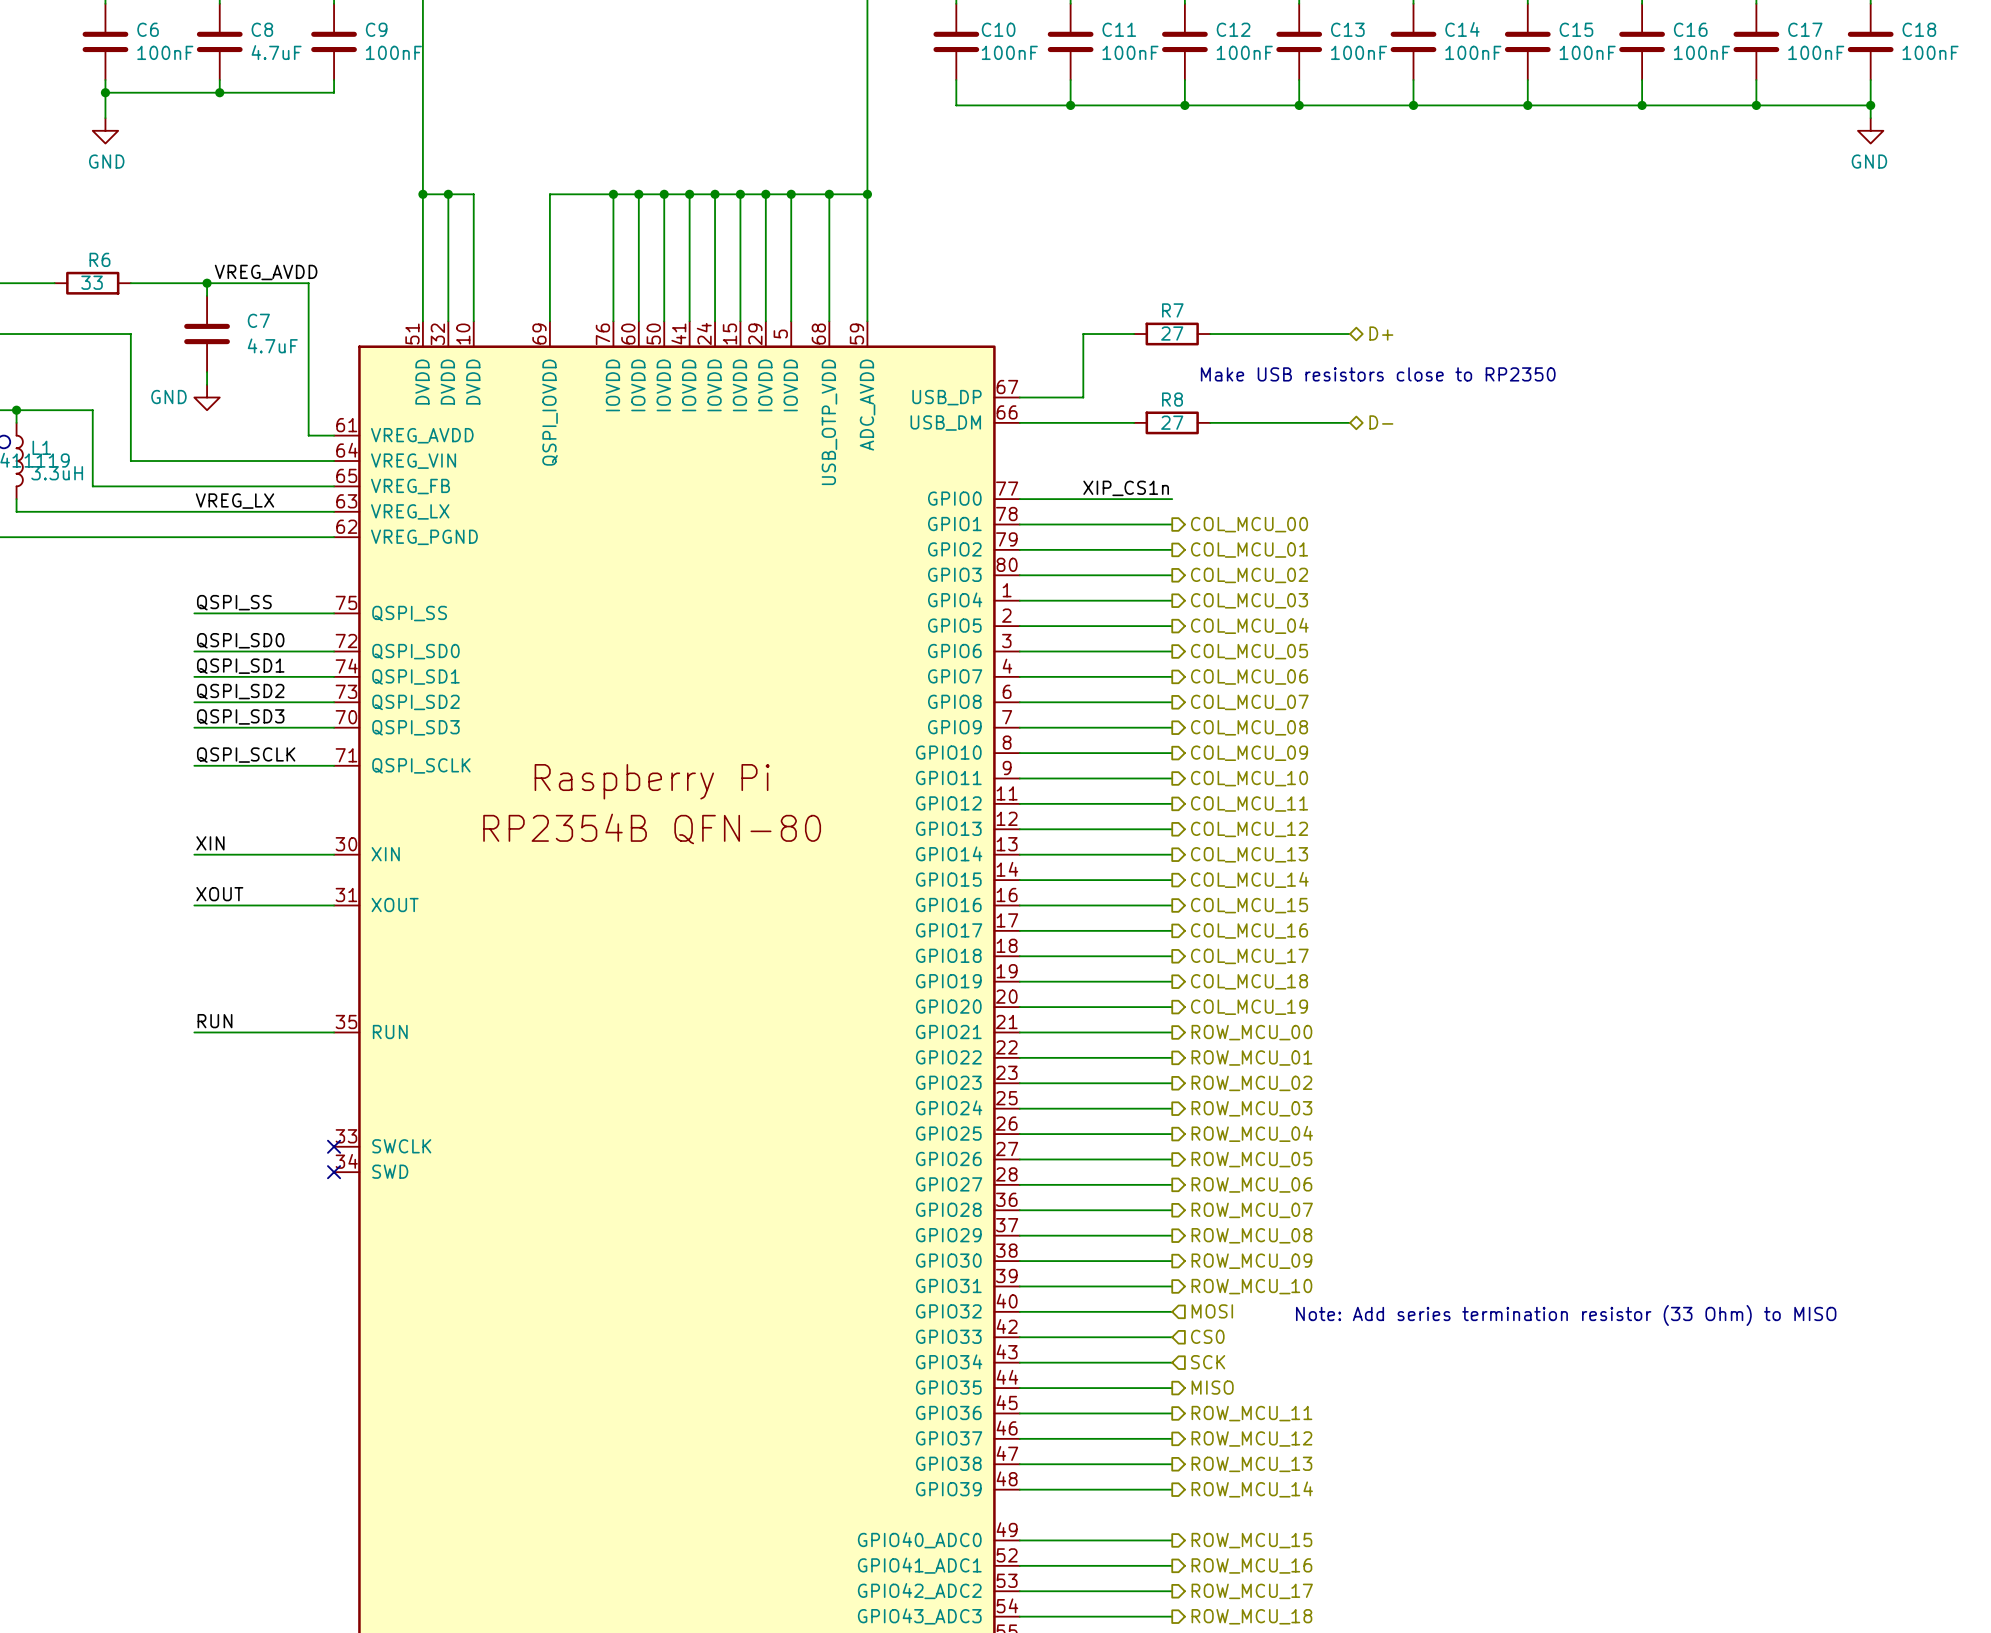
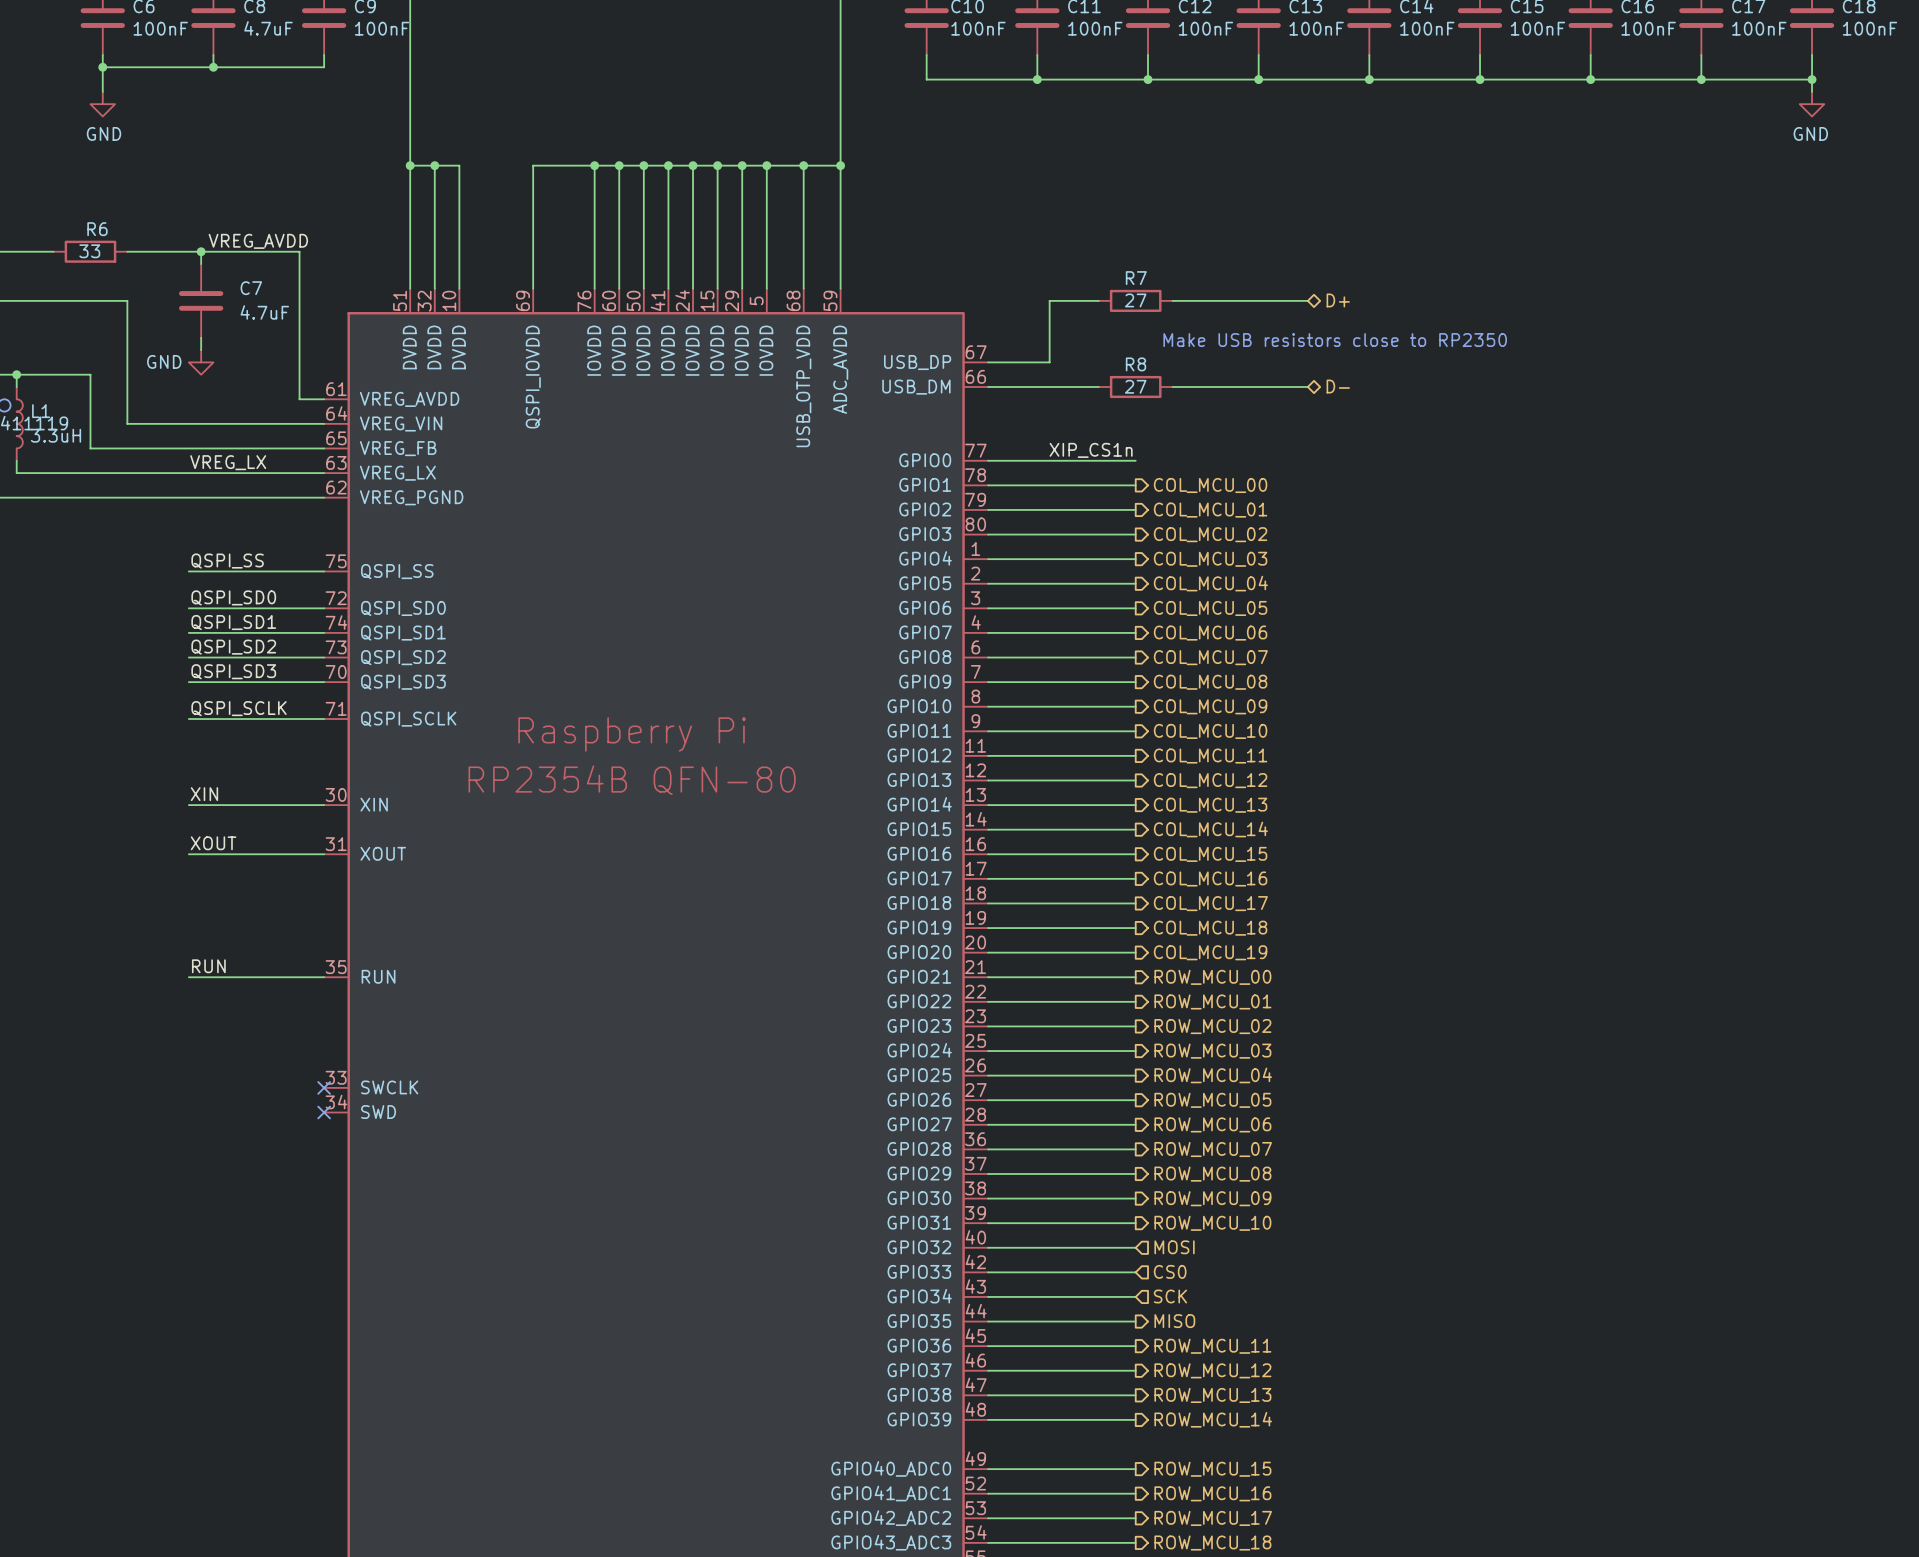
text: Note: Add series termination resistor (33 Ohm) to MISO (1566, 1315) -> none

